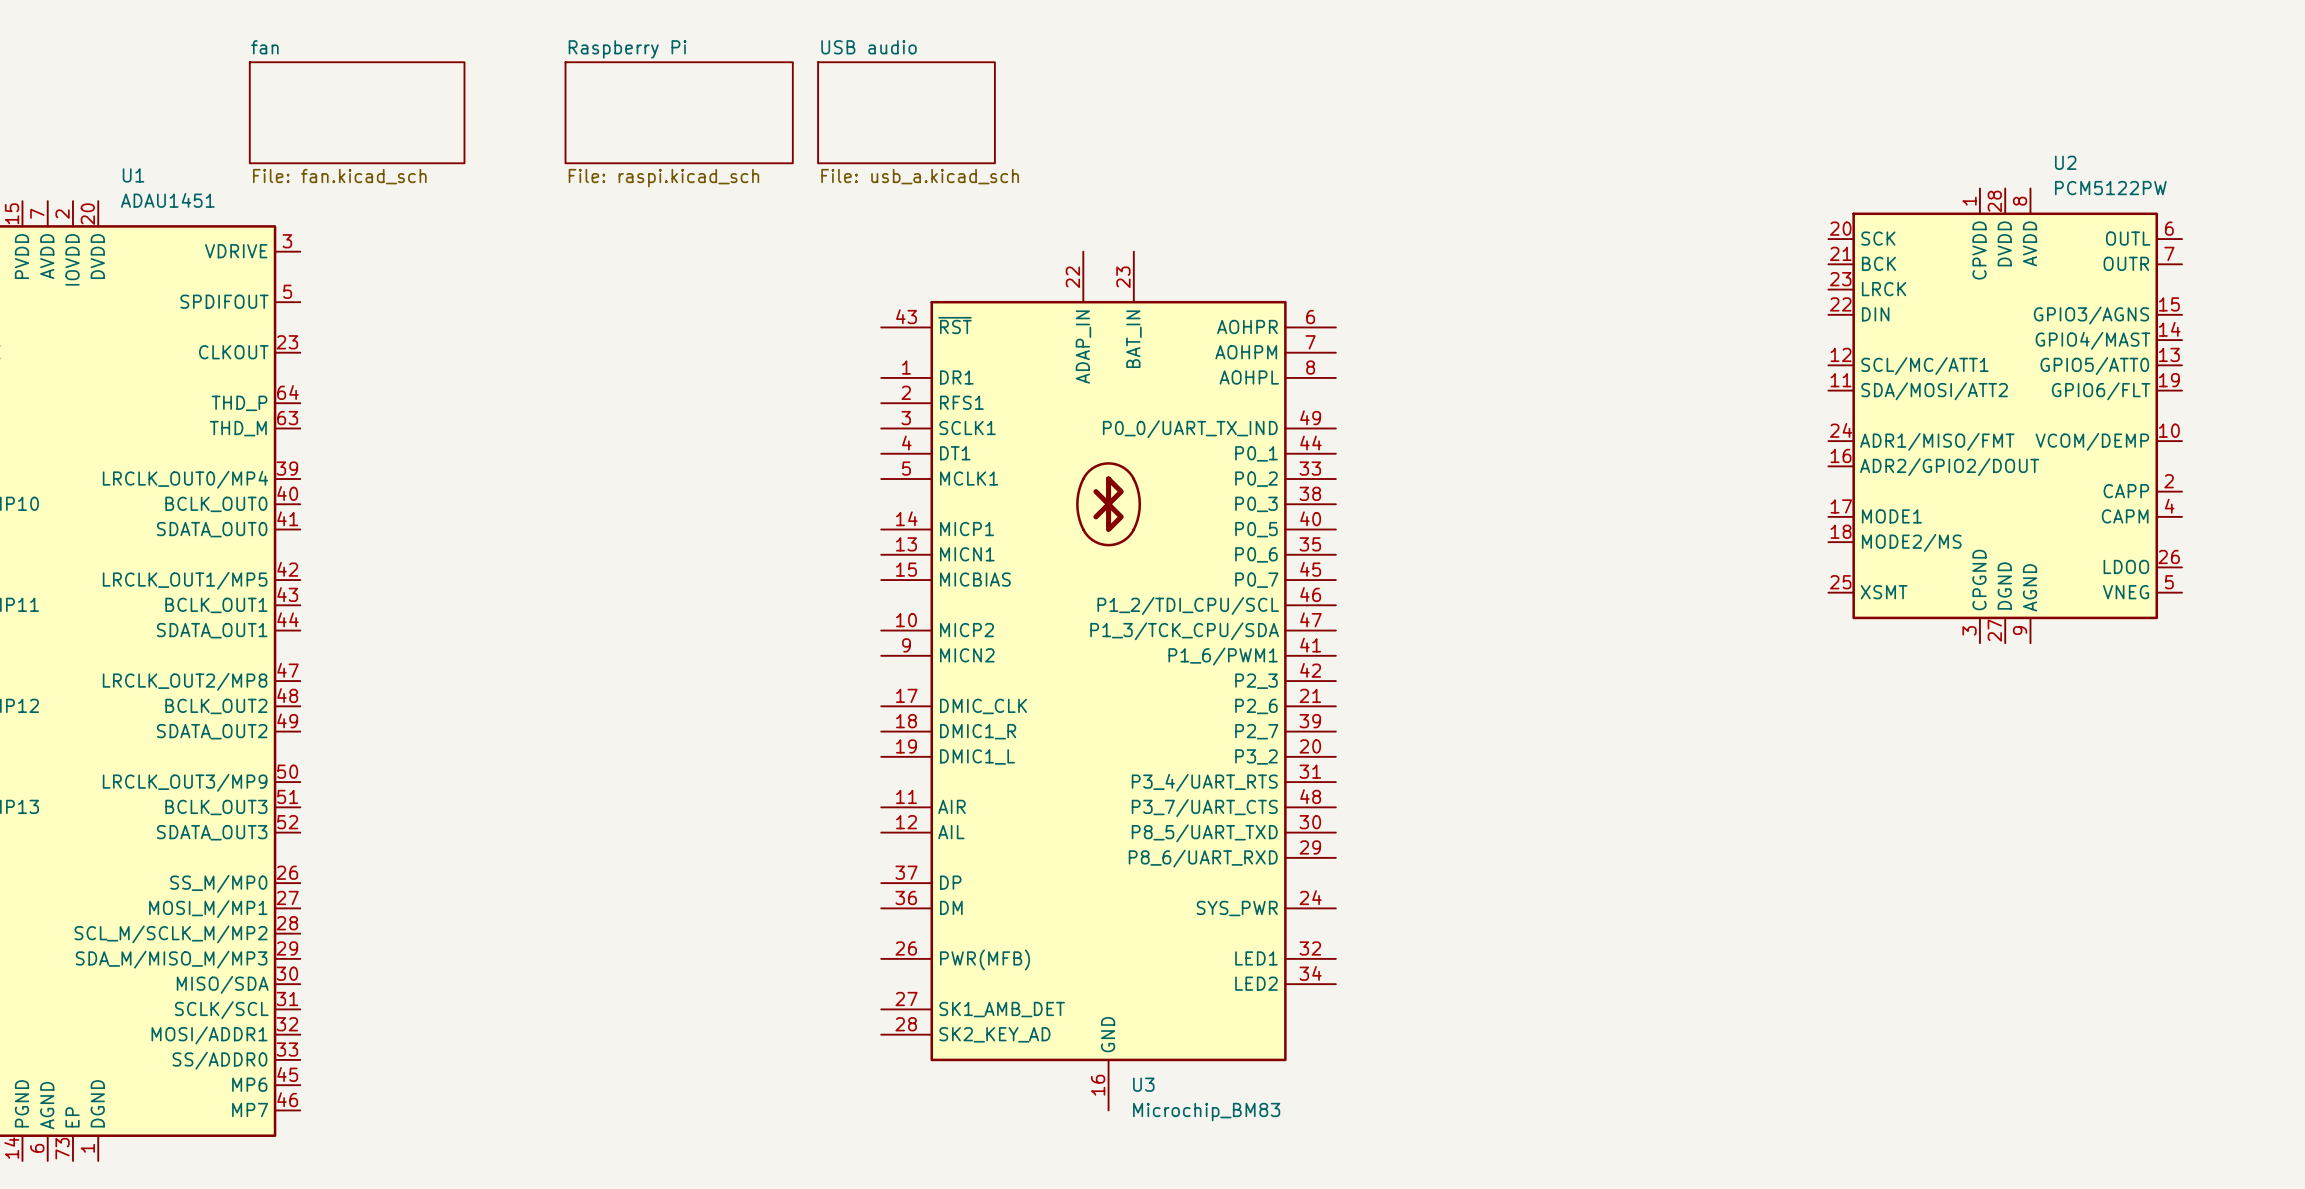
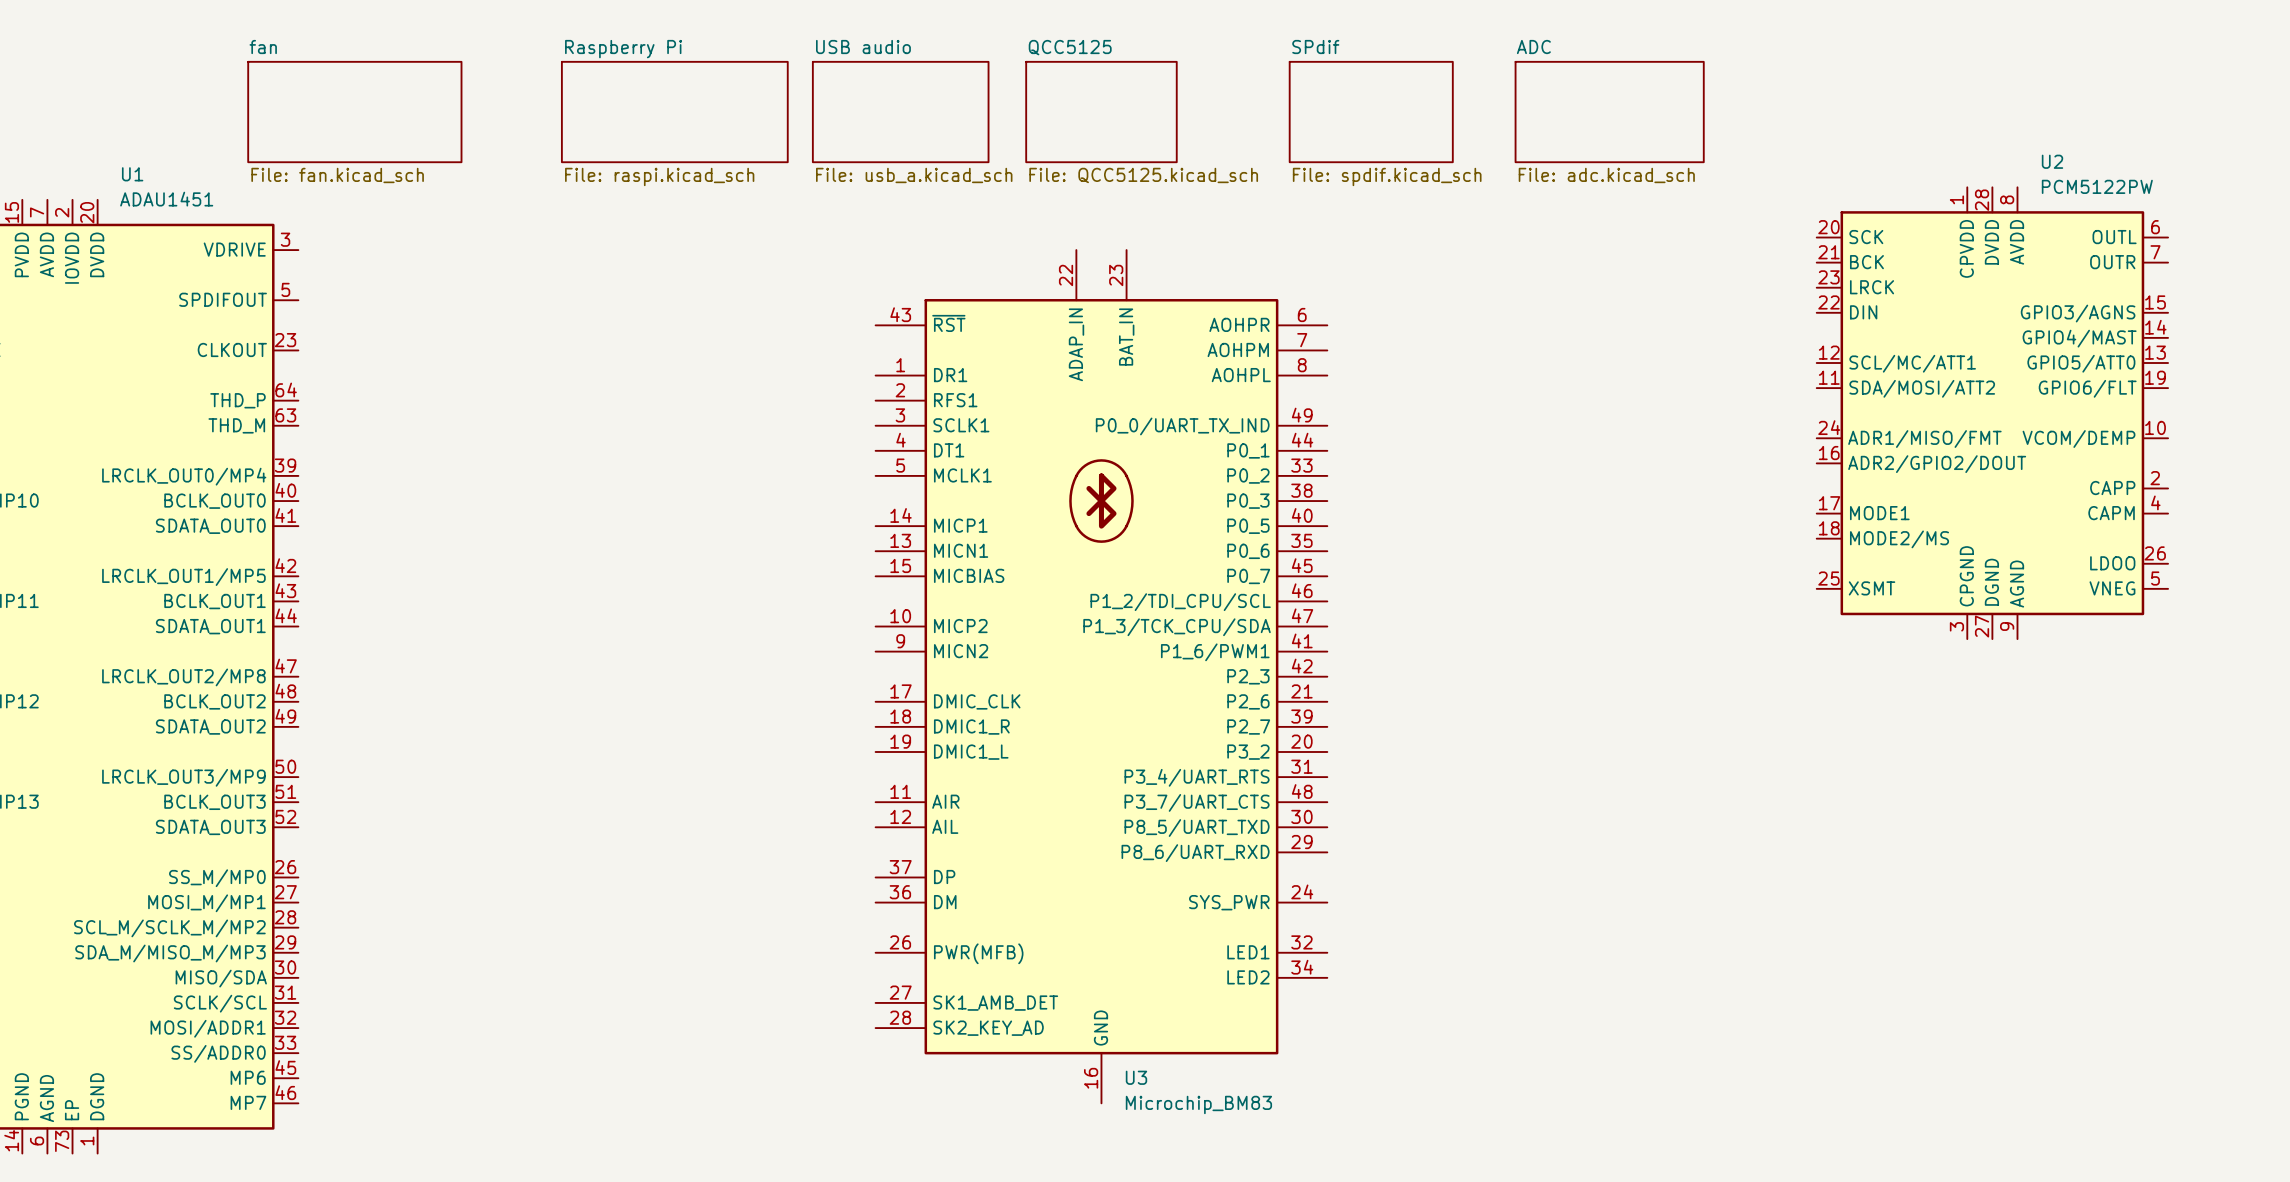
sheet QCC5125: none -> File: QCC5125.kicad_sch (1101, 112)
sheet SPdif: none -> File: spdif.kicad_sch (1371, 112)
sheet ADC: none -> File: adc.kicad_sch (1609, 112)

